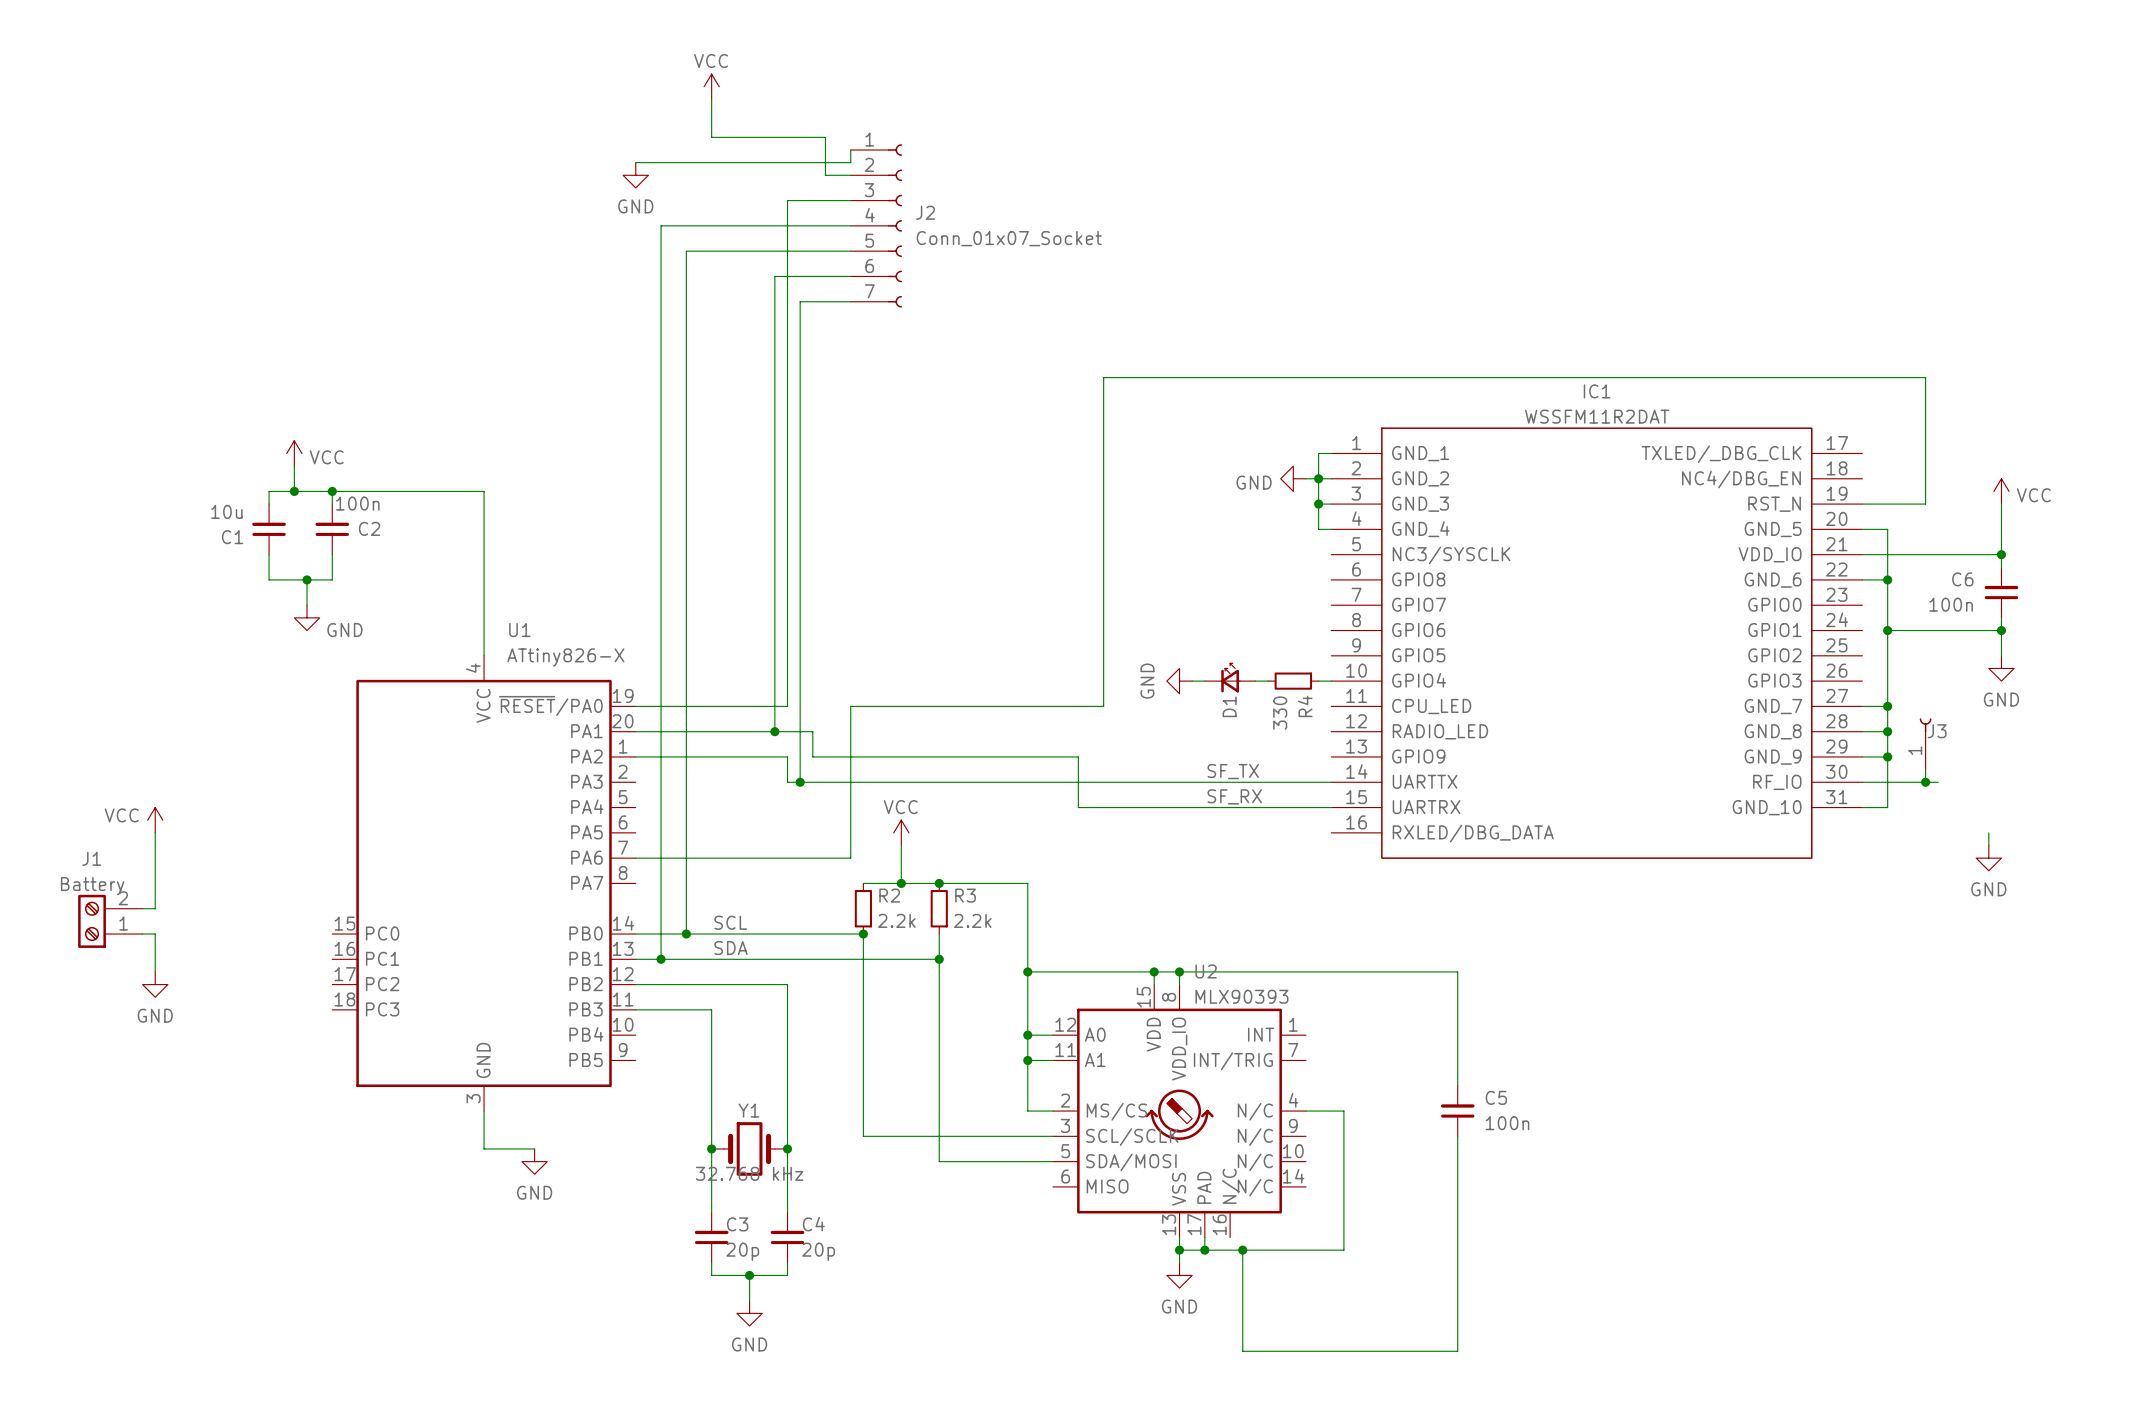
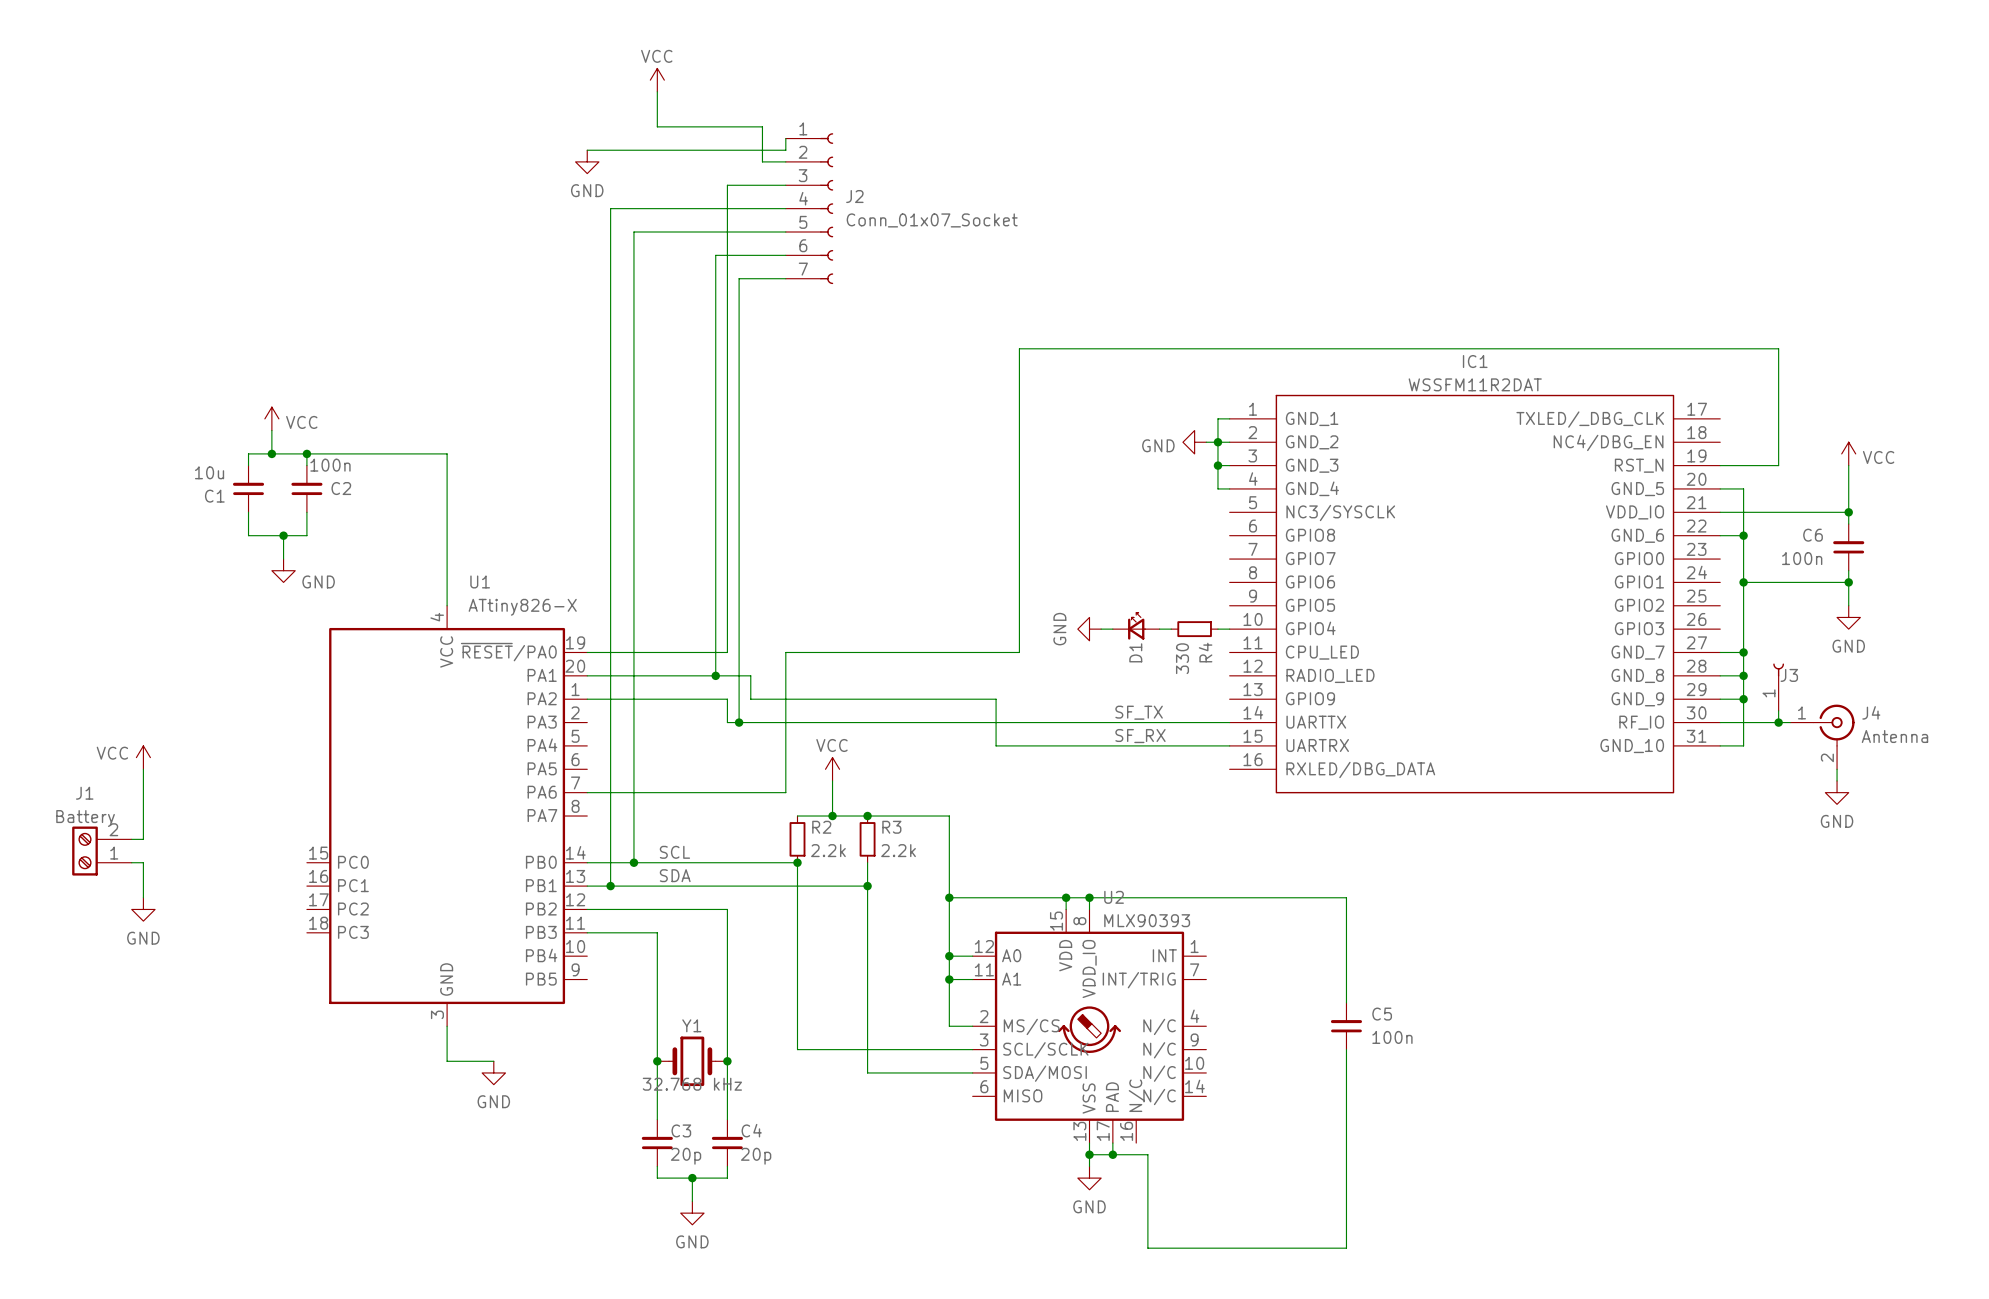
J4: none -> Antenna (1822, 736)
wire: (1305, 1111) (1343, 1111) (1343, 1250) (1242, 1250) -> none
junction: (1242, 1250) -> none

